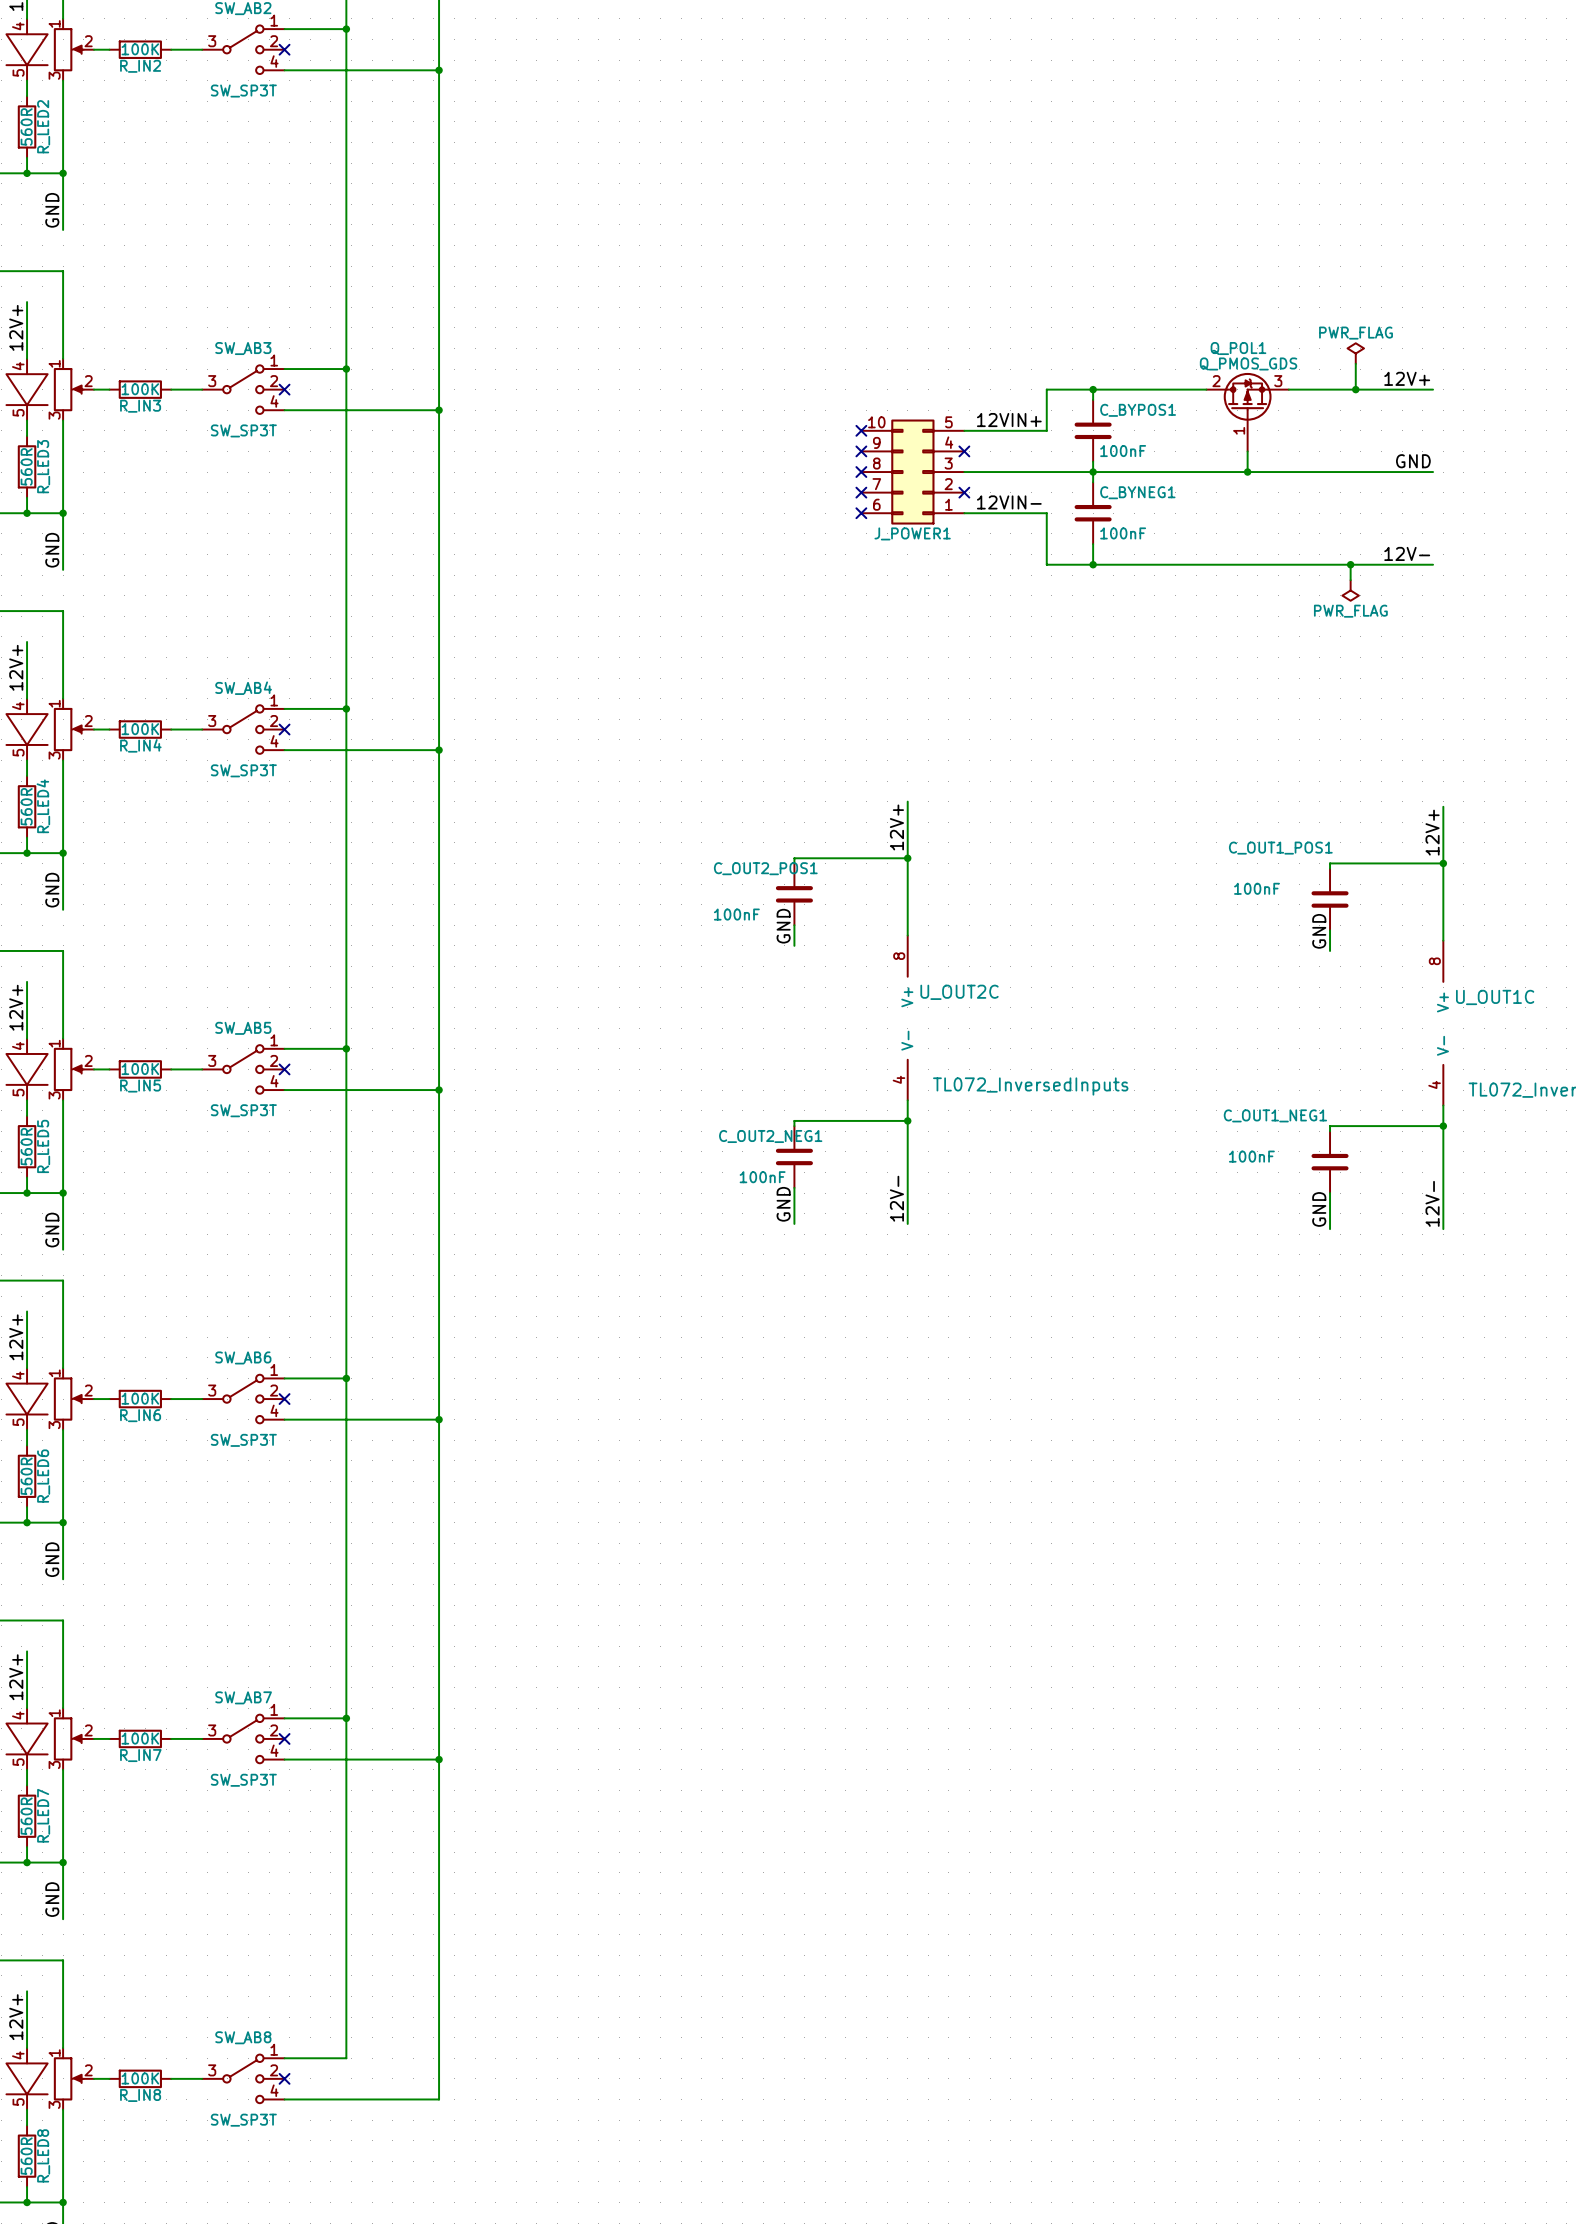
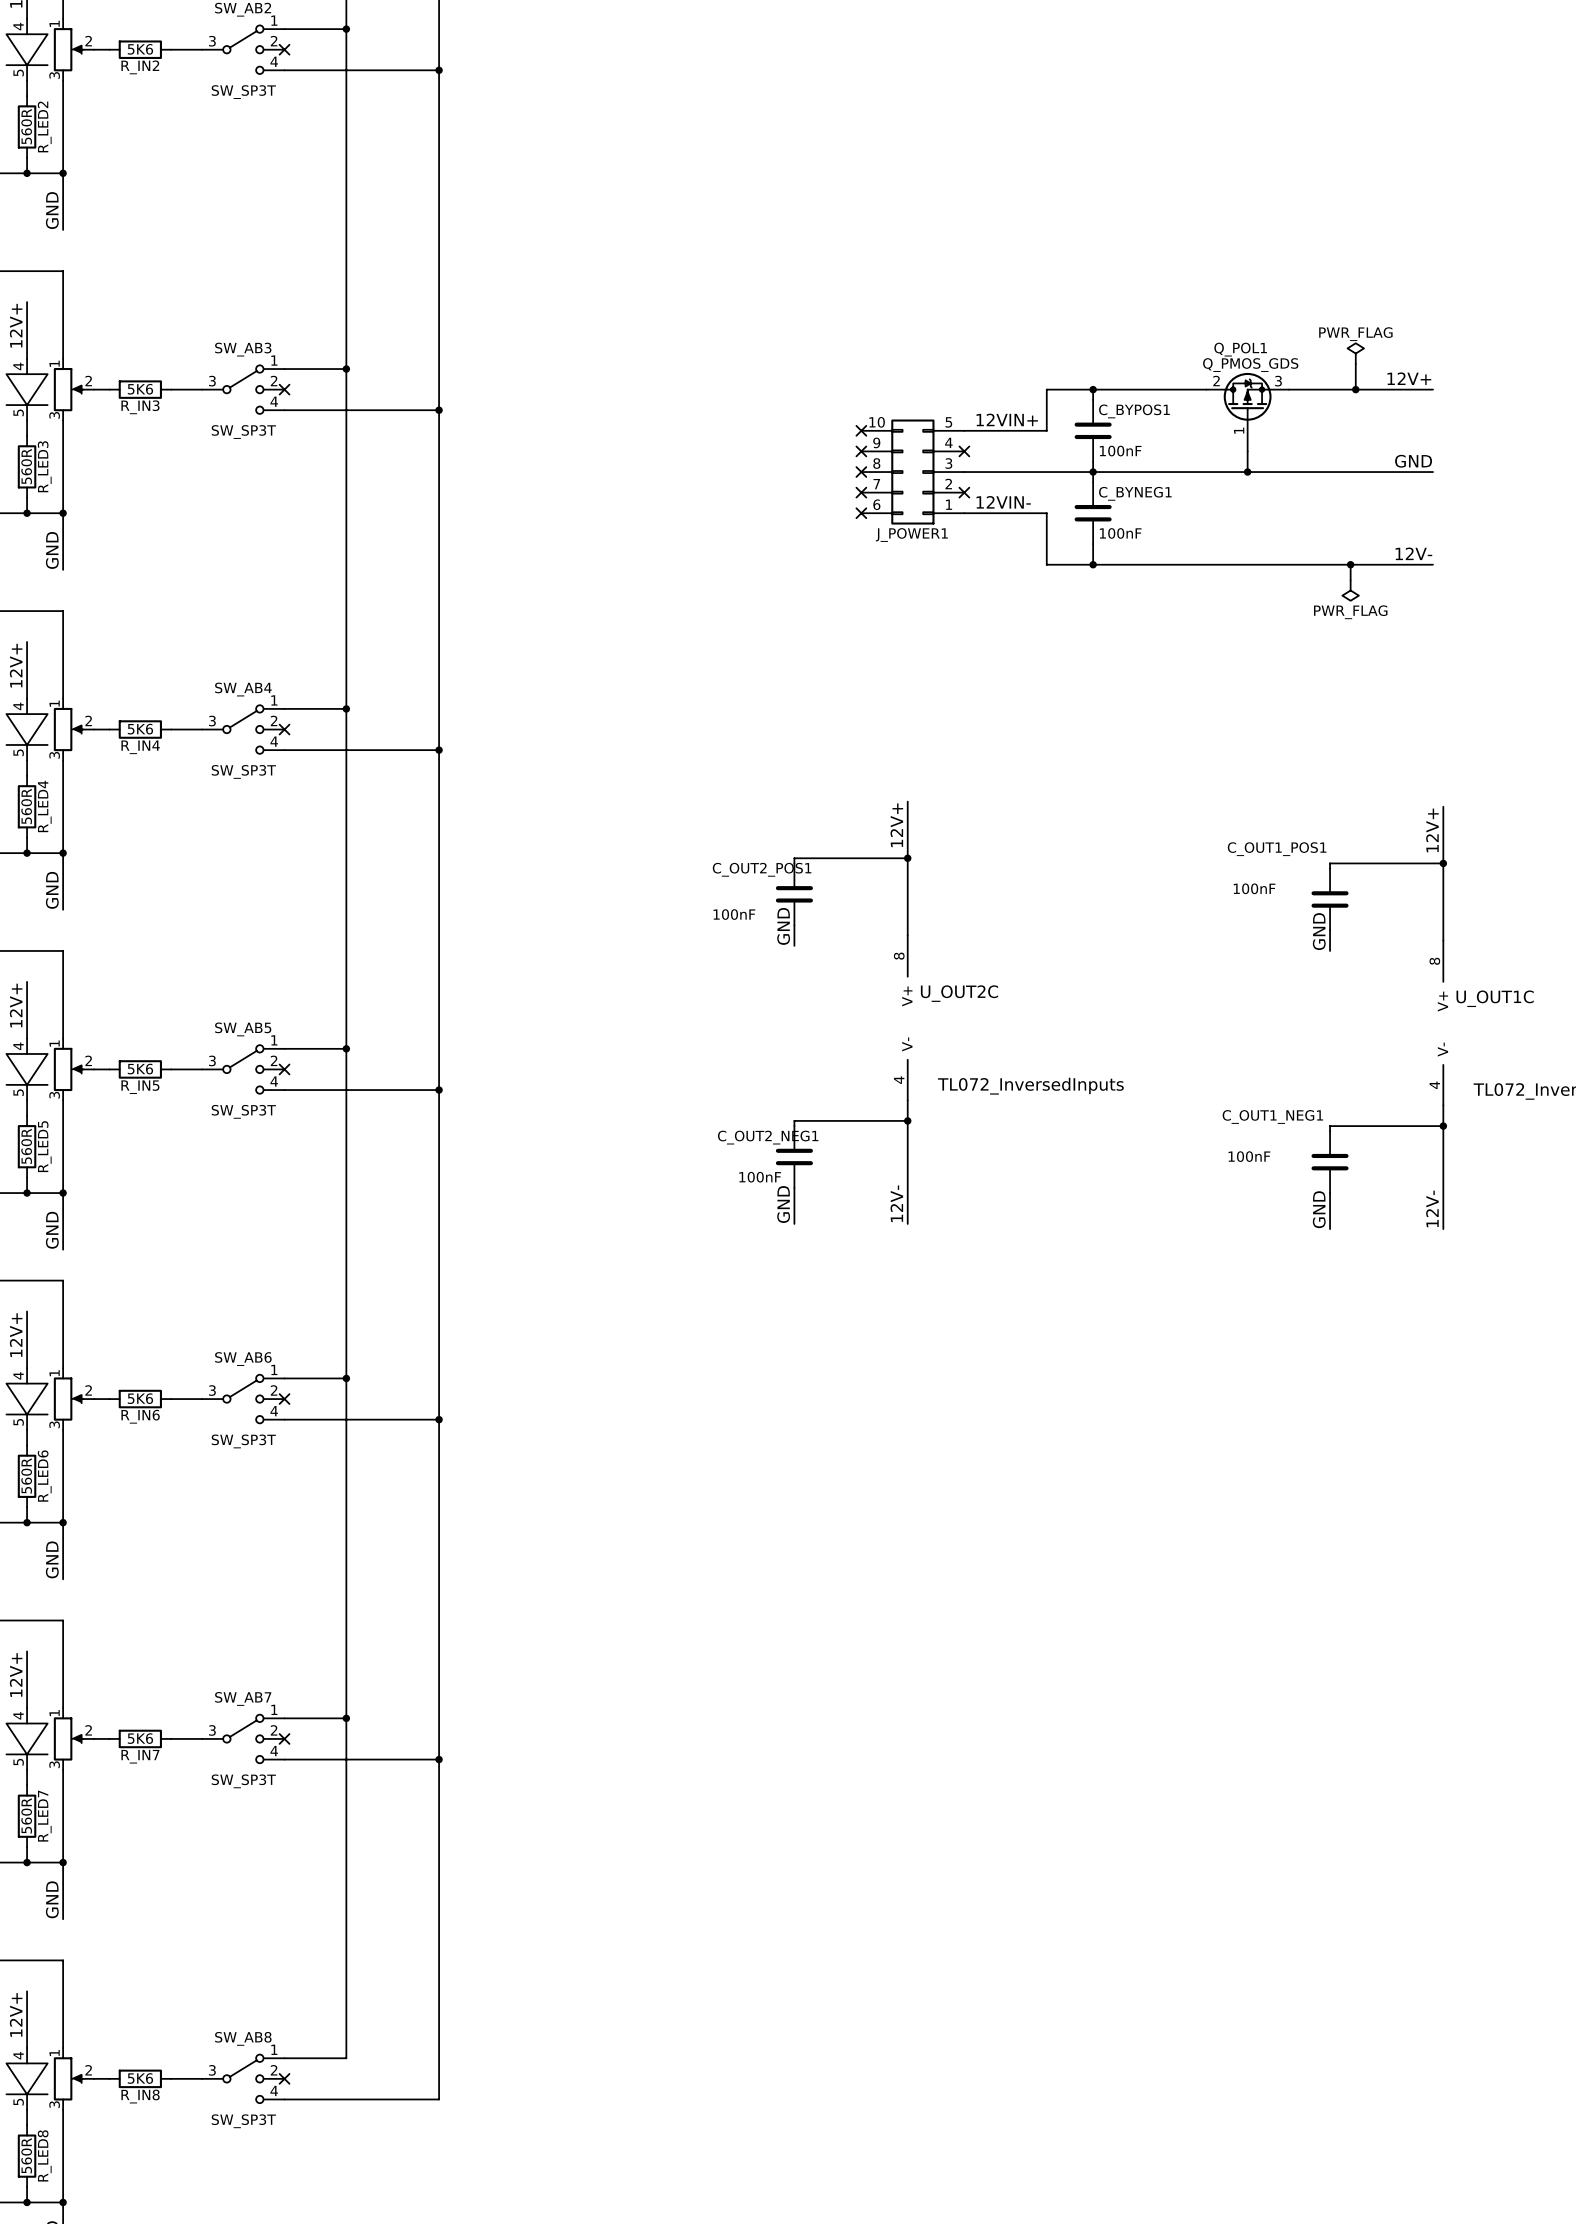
R_IN2 value: 100K (140, 49) -> 5K6 (140, 49)
R_IN3 value: 100K (140, 389) -> 5K6 (140, 389)
R_IN4 value: 100K (140, 729) -> 5K6 (140, 729)
R_IN5 value: 100K (140, 1069) -> 5K6 (140, 1069)
R_IN6 value: 100K (140, 1398) -> 5K6 (140, 1398)
R_IN7 value: 100K (140, 1738) -> 5K6 (140, 1738)
R_IN8 value: 100K (140, 2078) -> 5K6 (140, 2078)

